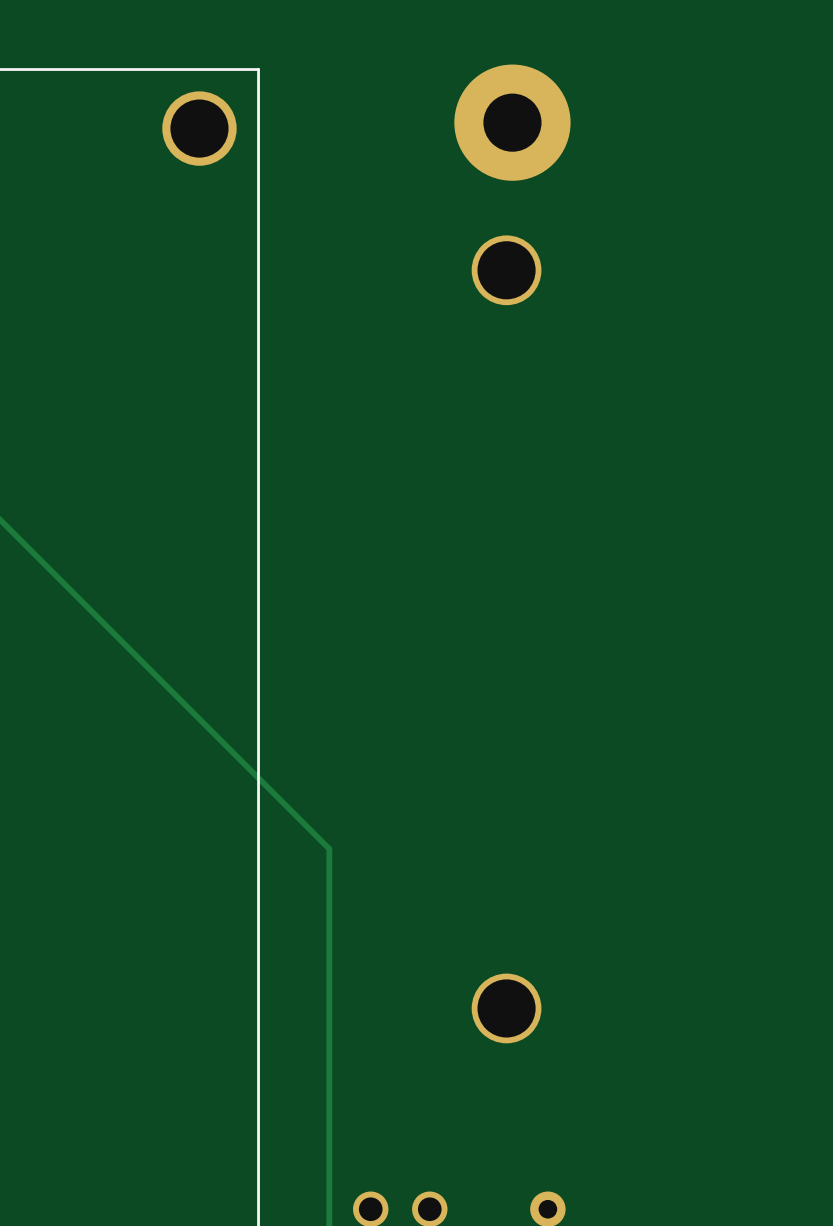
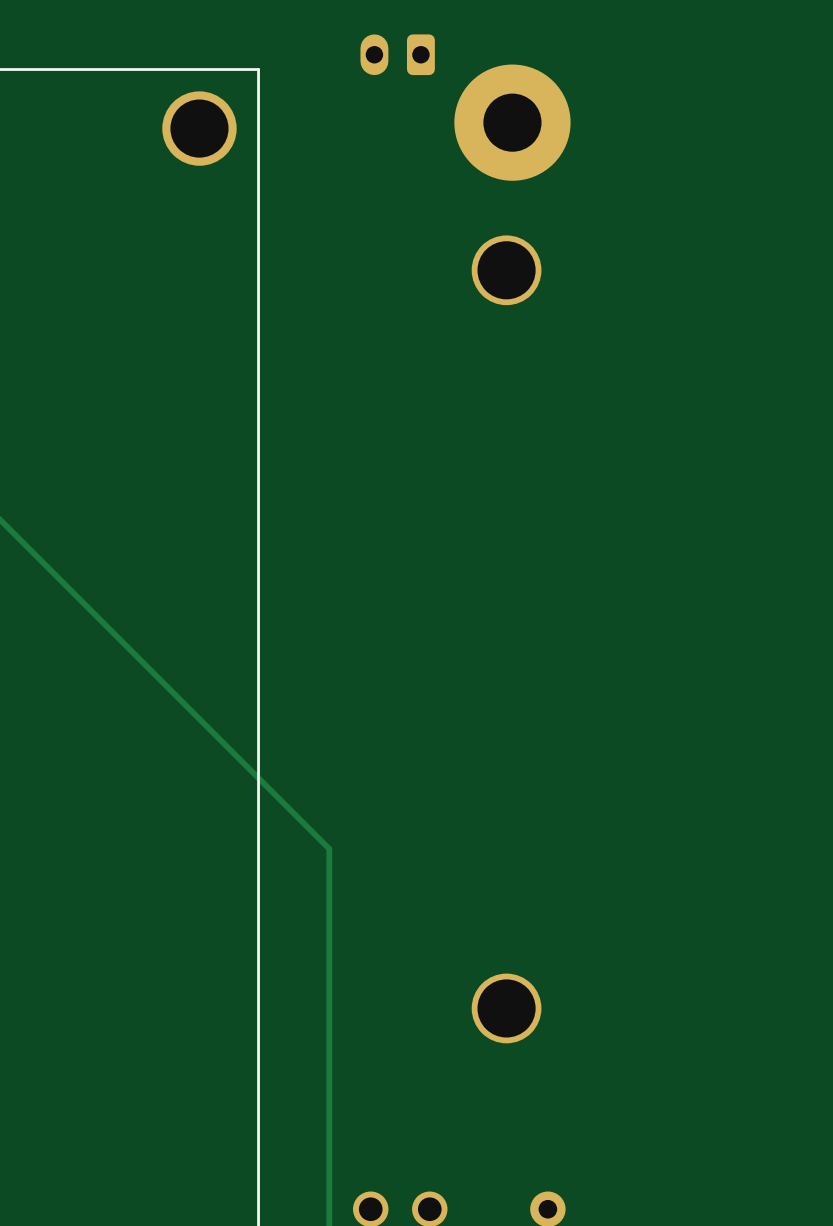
part: none -> (397, 54)

